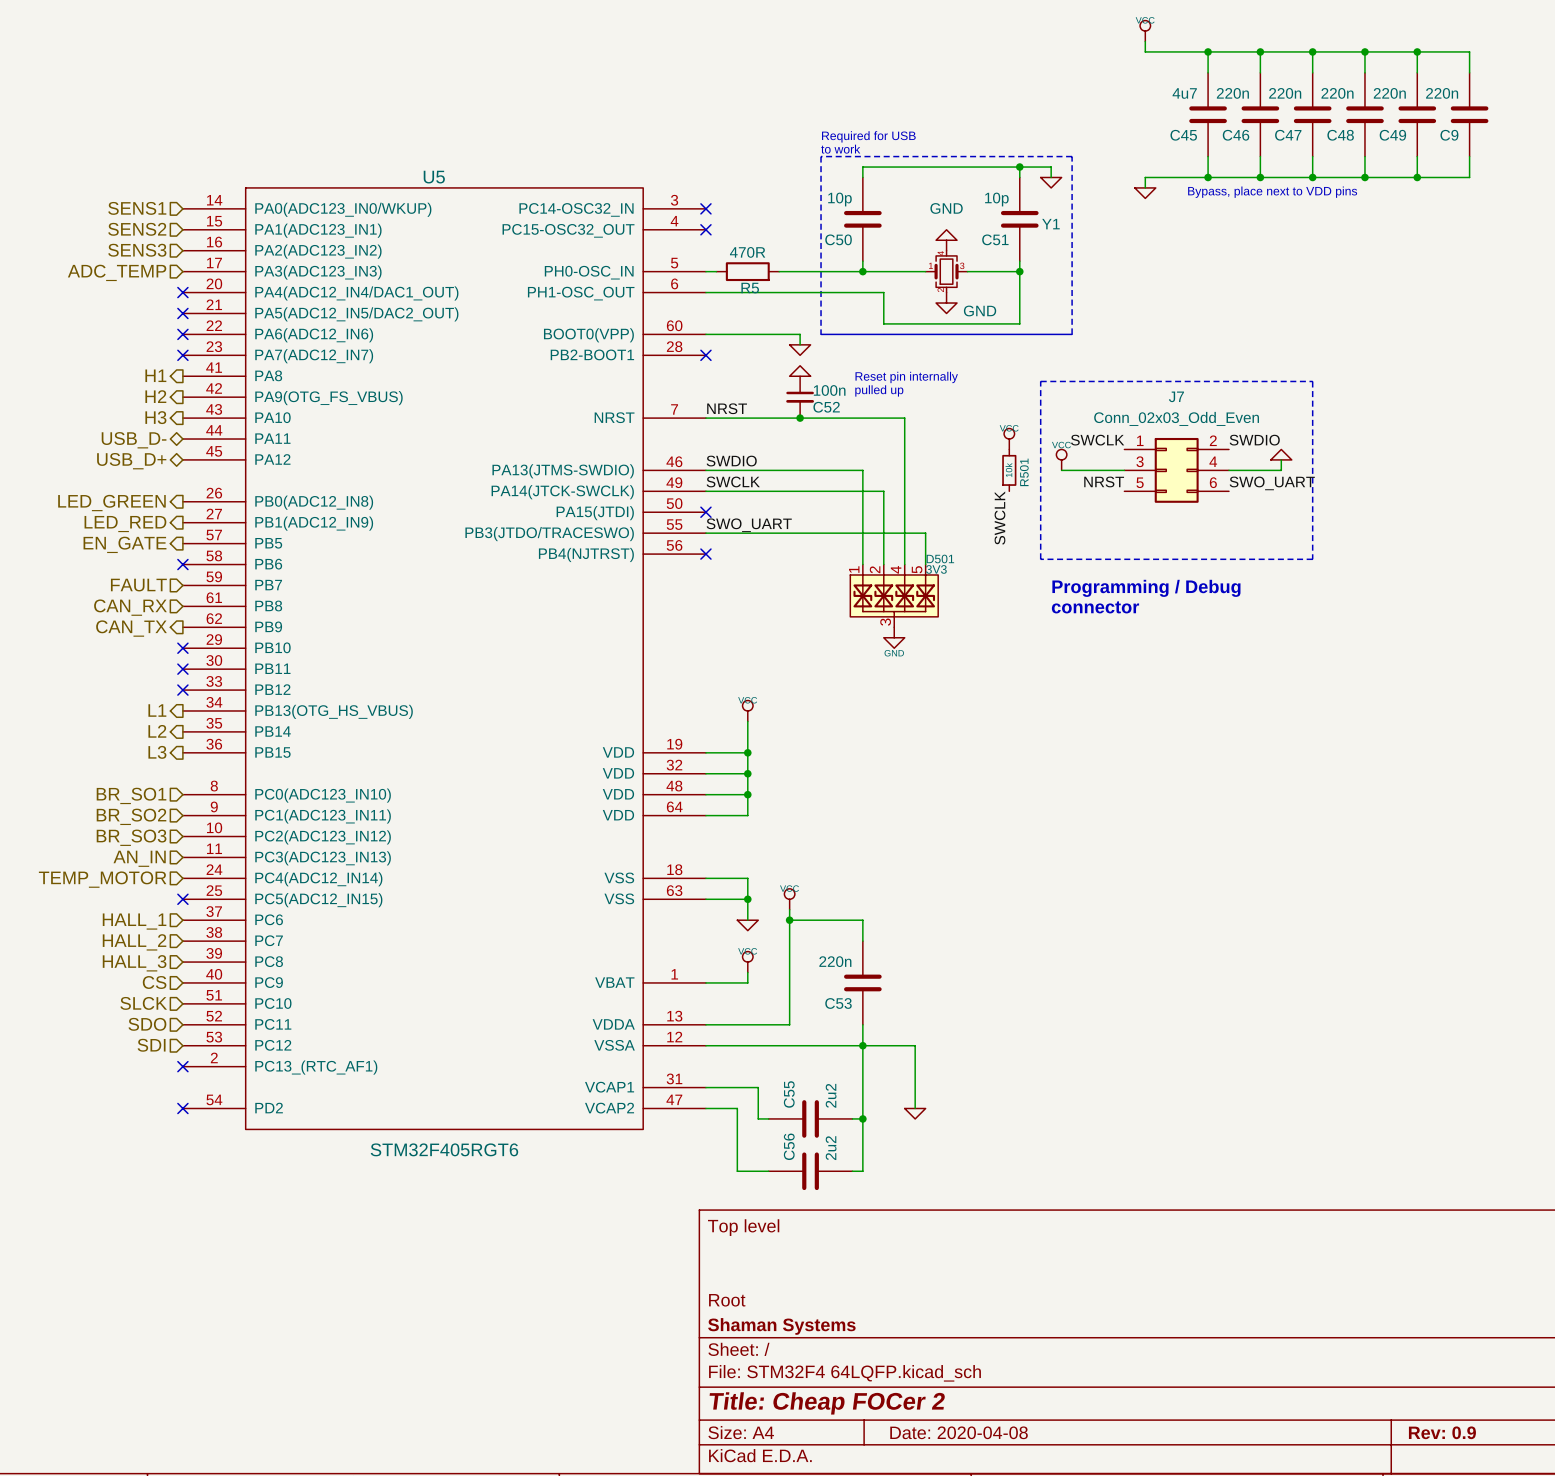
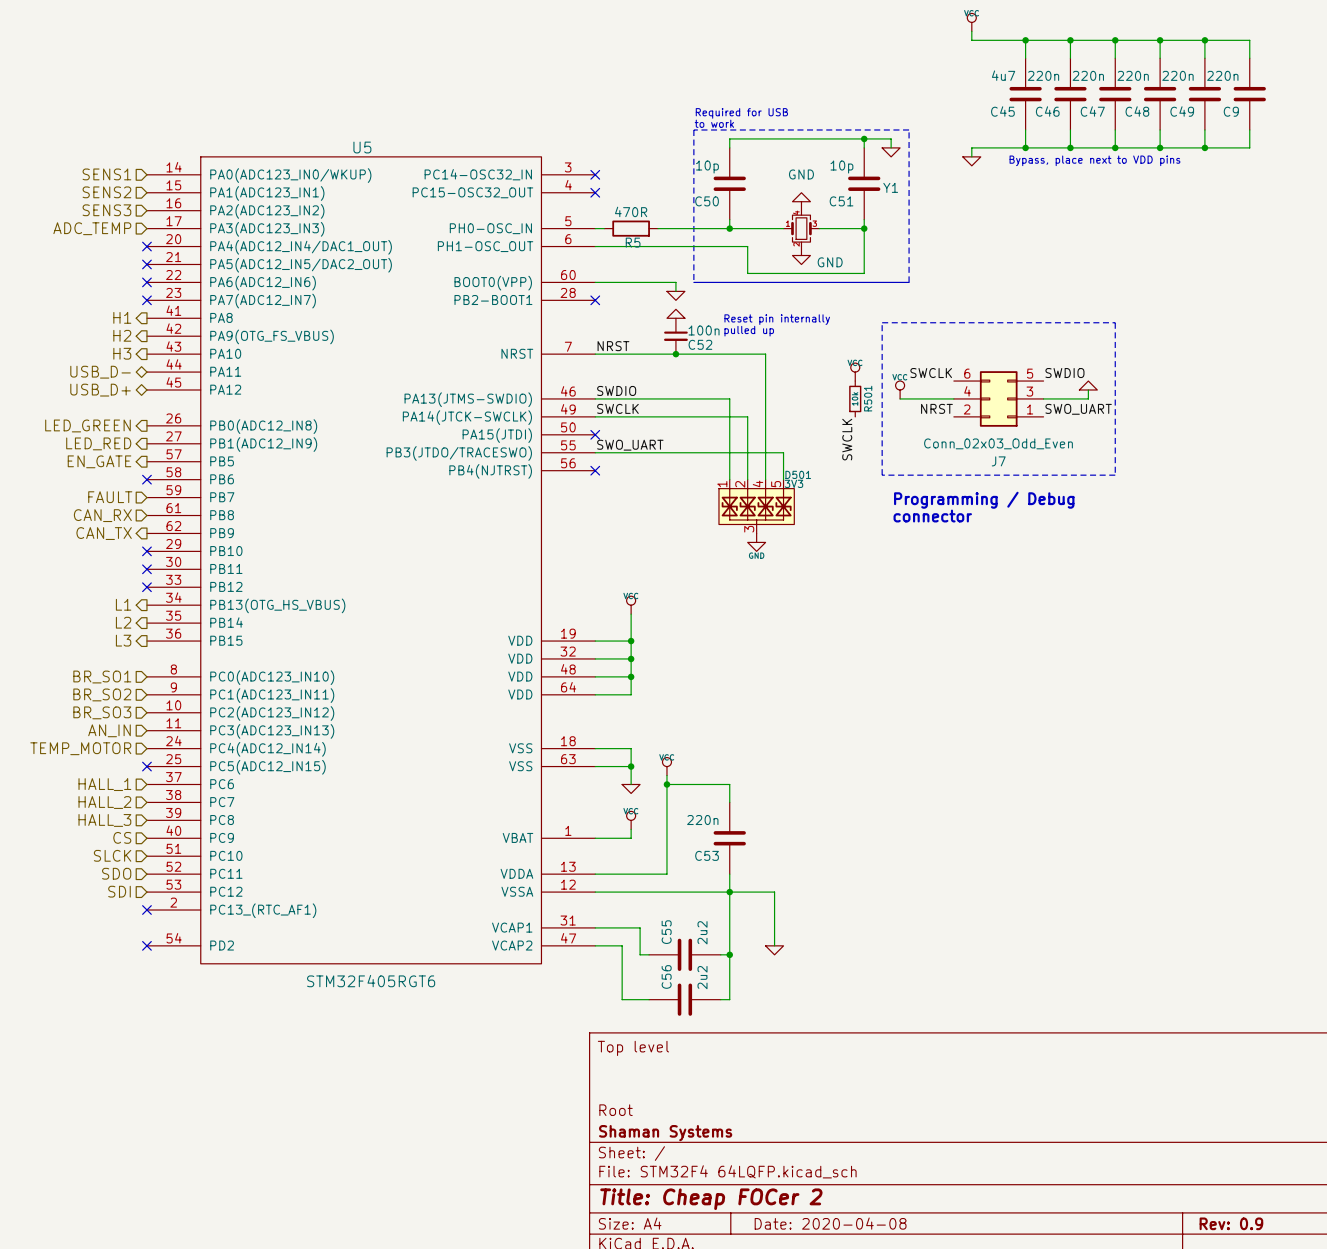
J7 rotation: 0° (1176, 470) -> 180° (998, 398)

